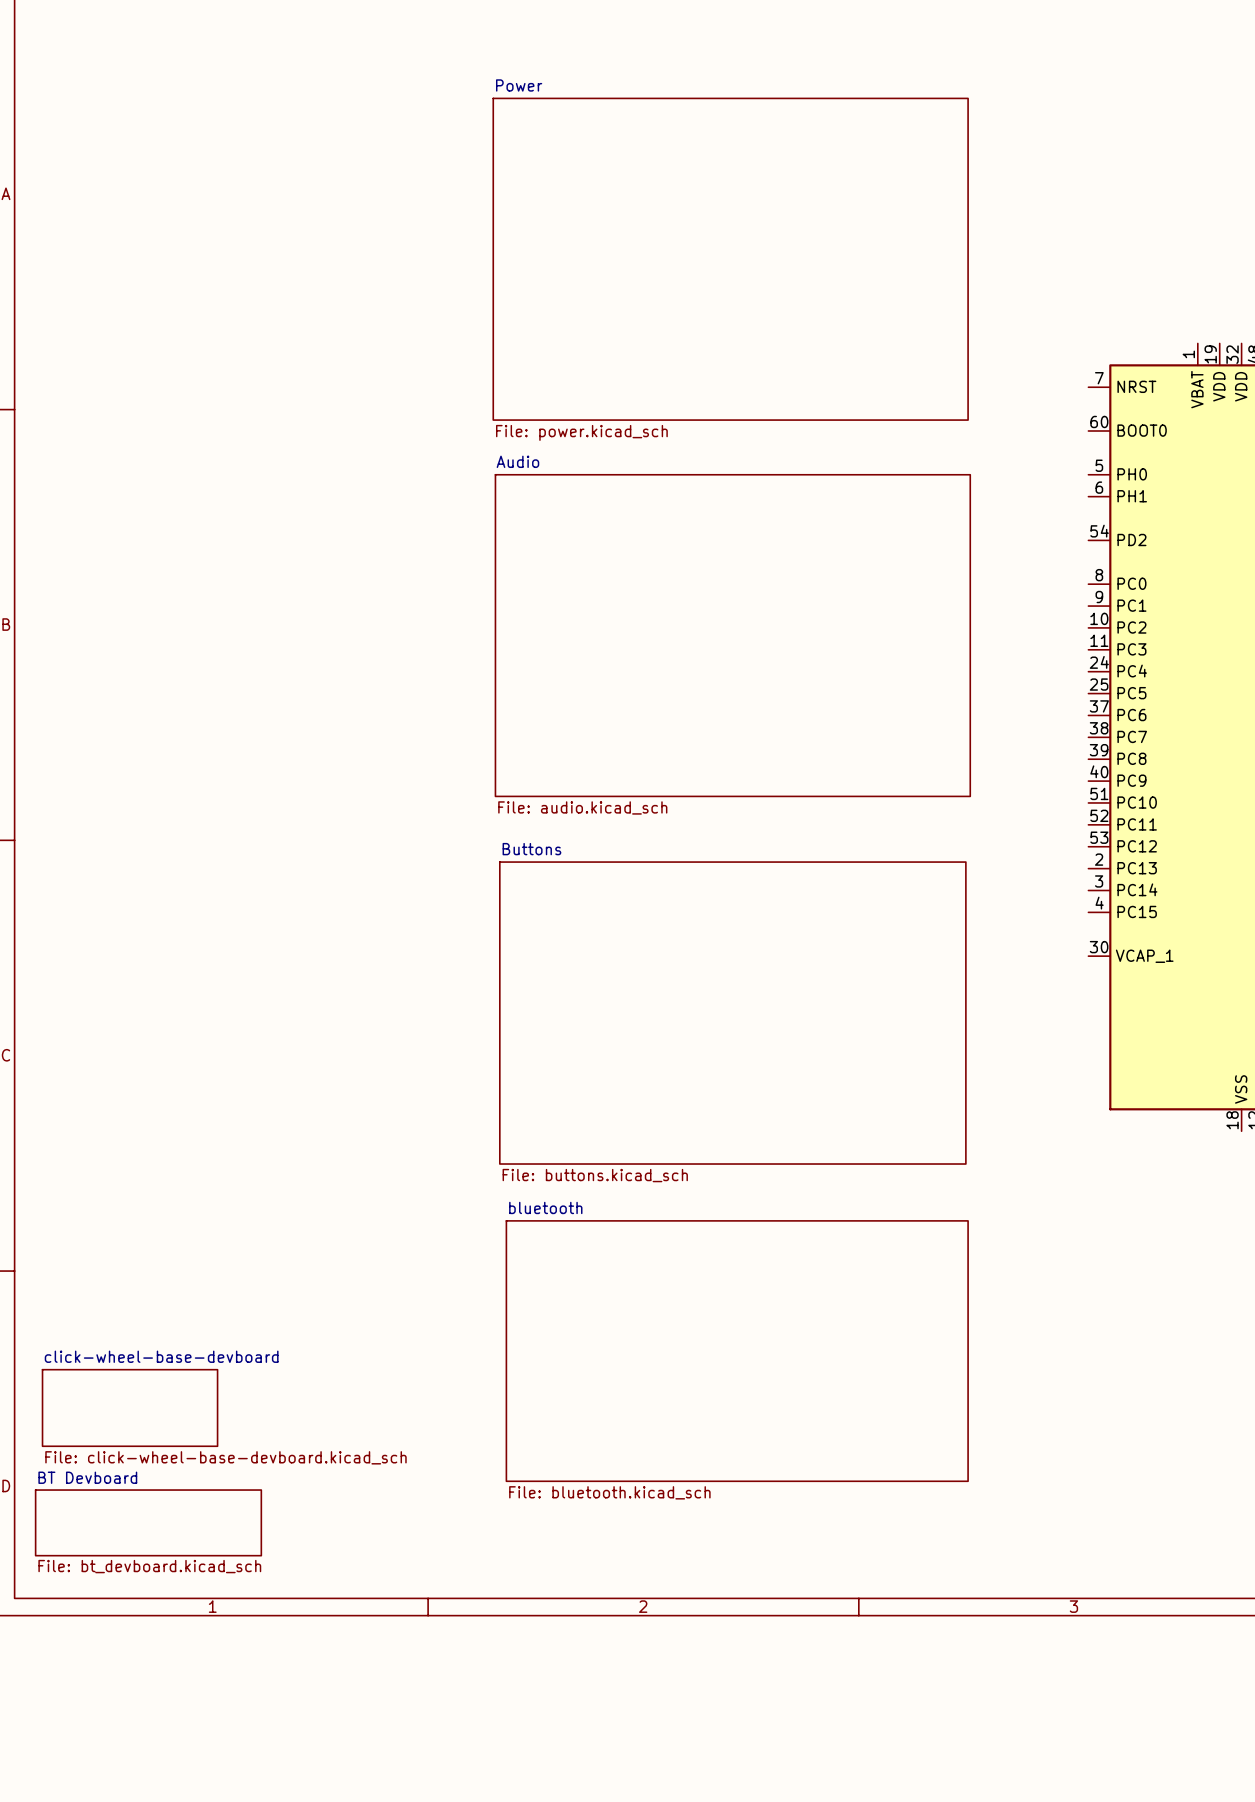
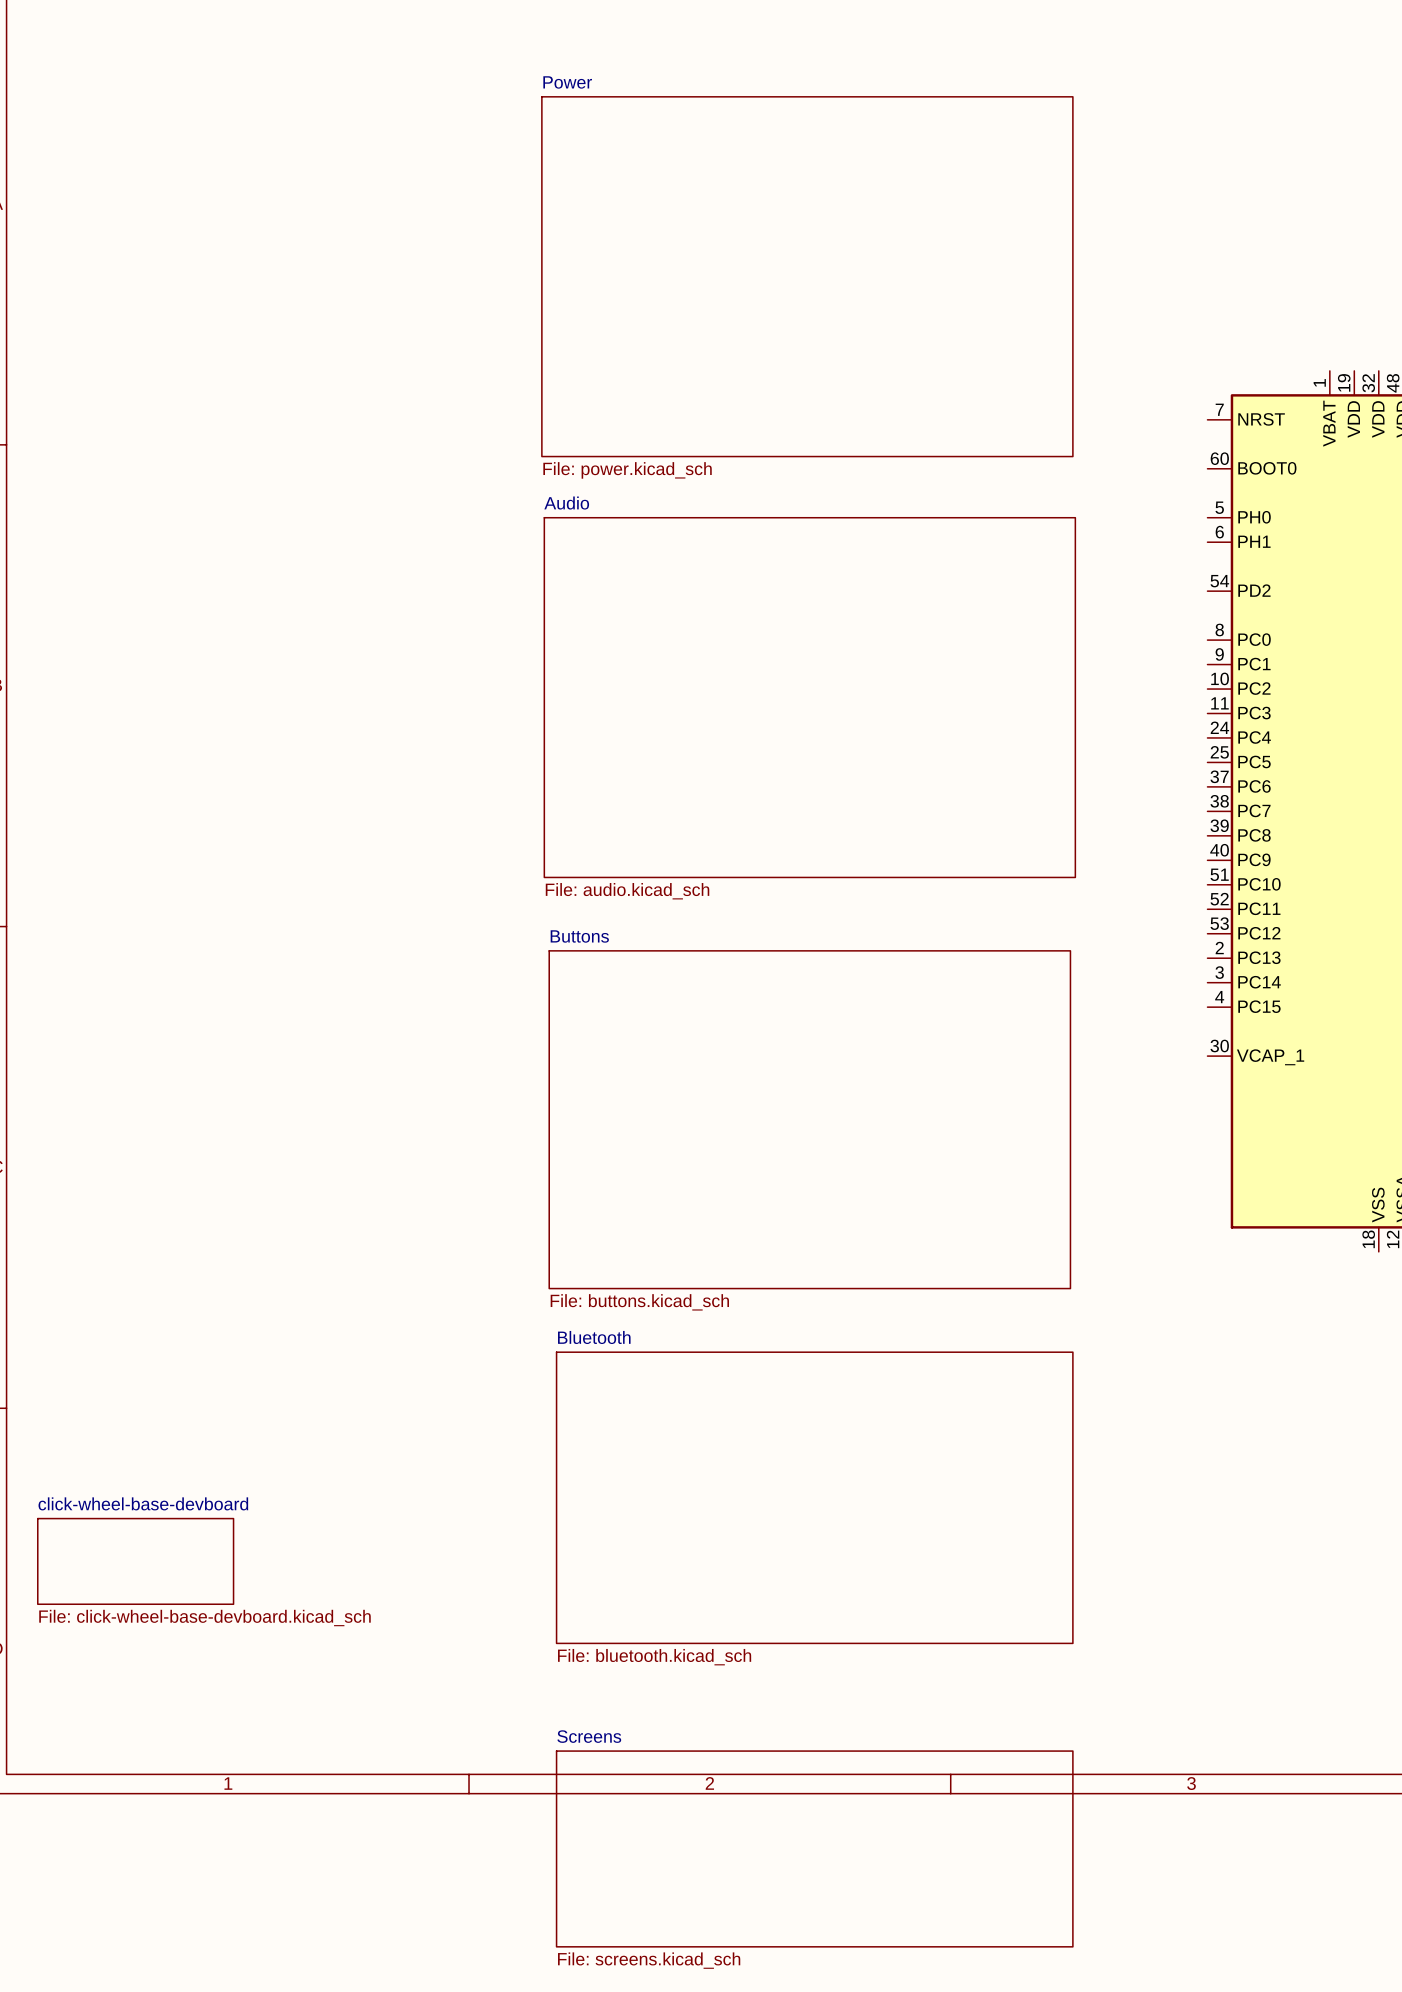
sheet bluetooth name: bluetooth (545, 1207) -> Bluetooth (594, 1337)
sheet BT Devboard: File: bt_devboard.kicad_sch (148, 1522) -> none
sheet Screens: none -> File: screens.kicad_sch (814, 1848)

